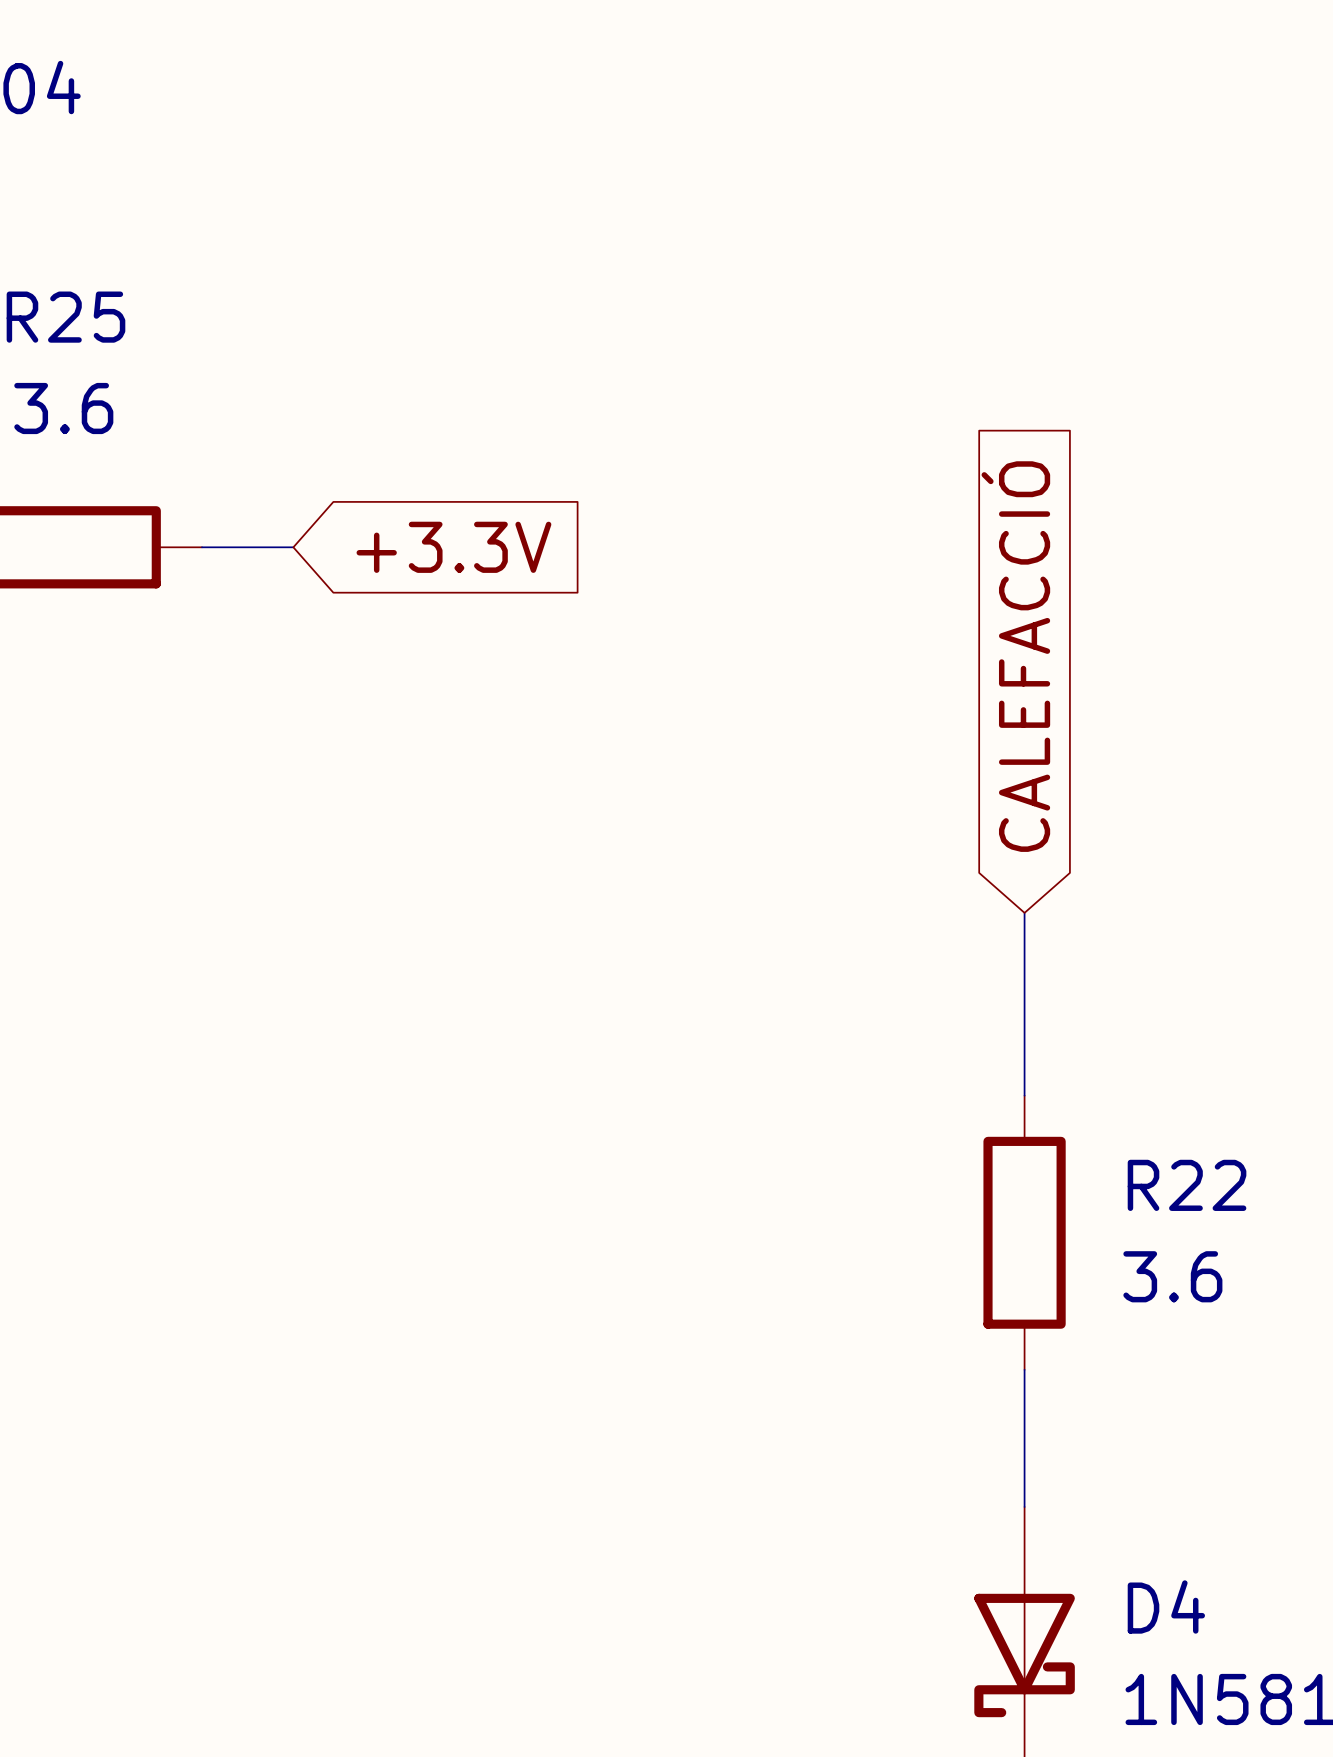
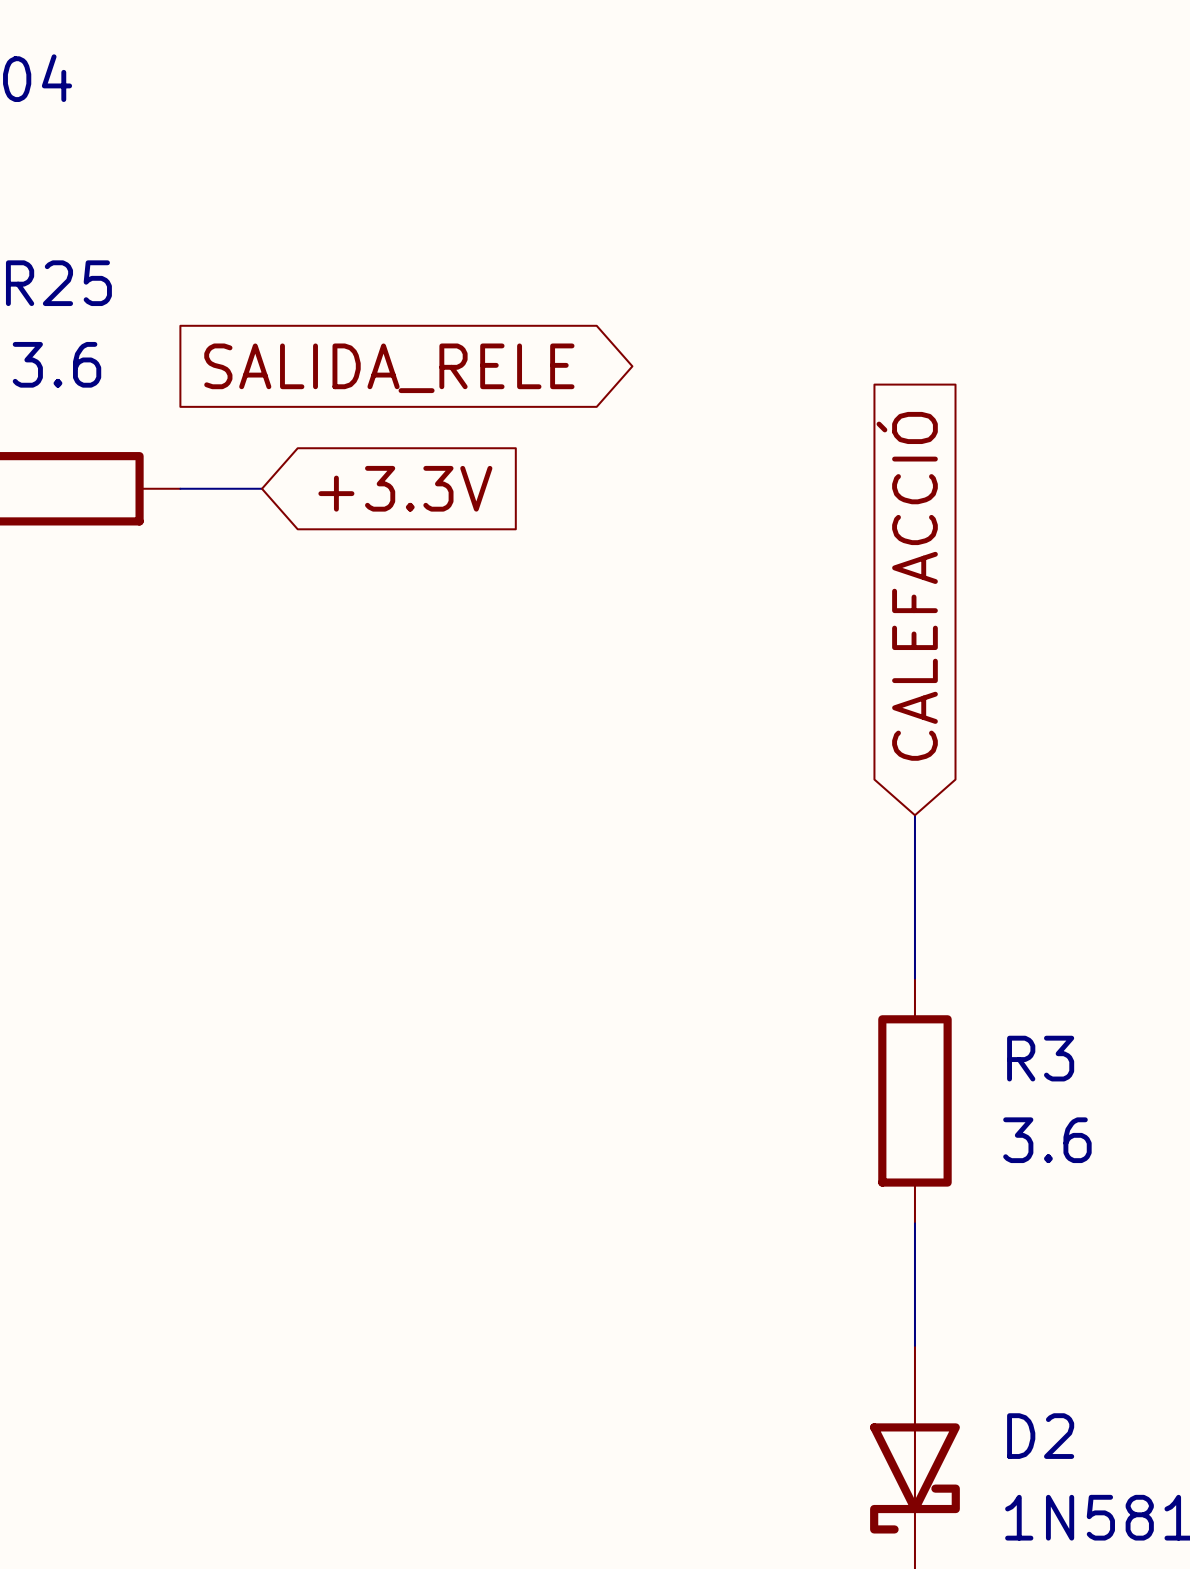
global label: none -> SALIDA_RELE (389, 368)
R22 name: R22 (1187, 1185) -> R3 (1040, 1058)
D4 name: D4 (1166, 1606) -> D2 (1040, 1436)

